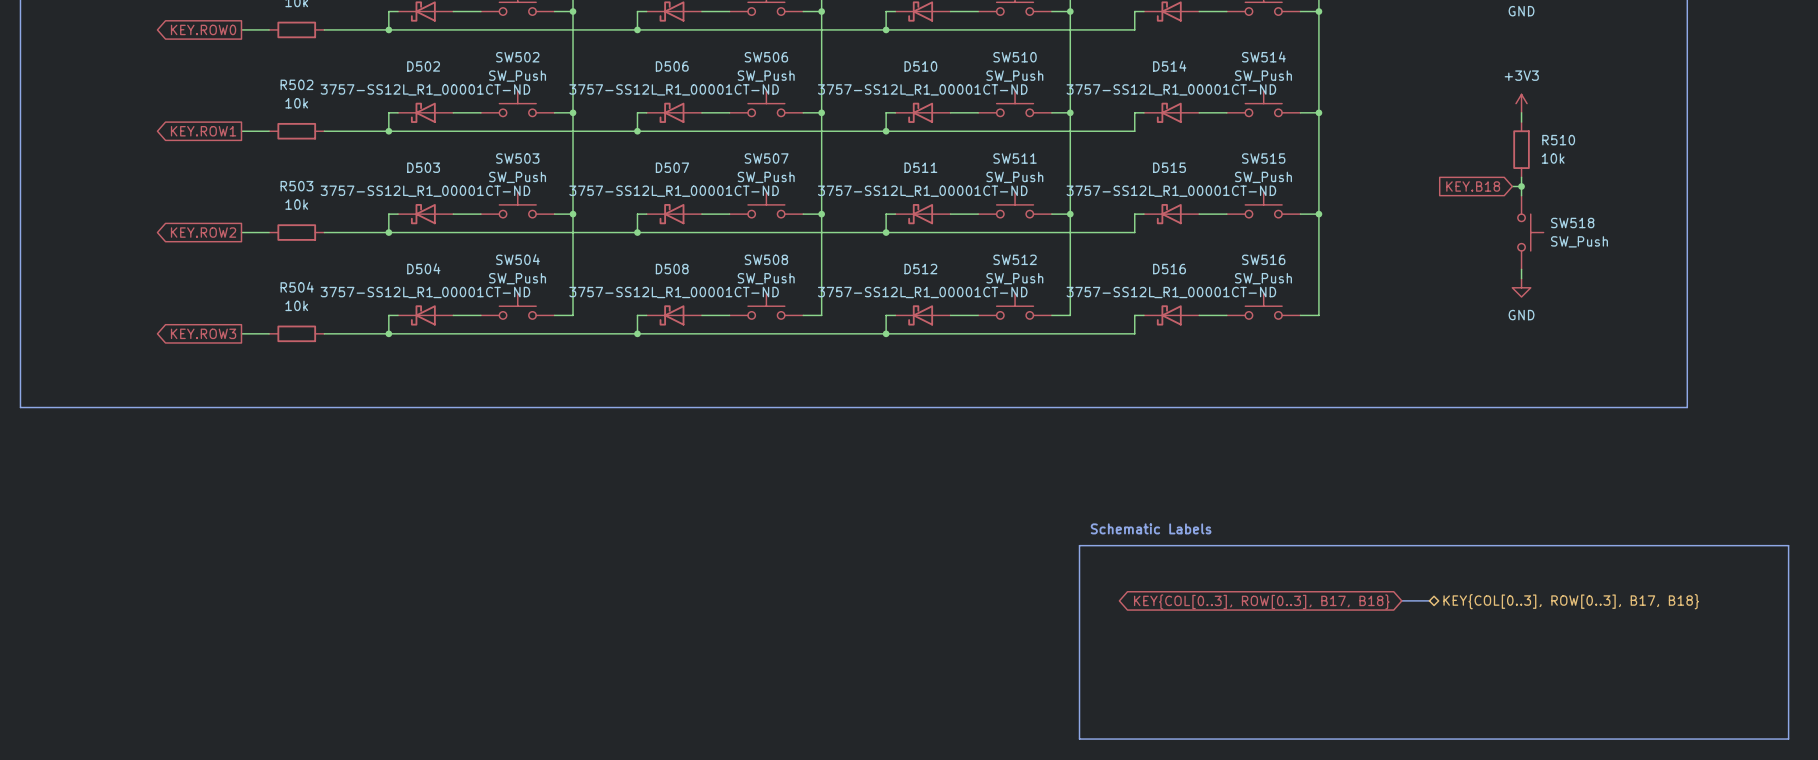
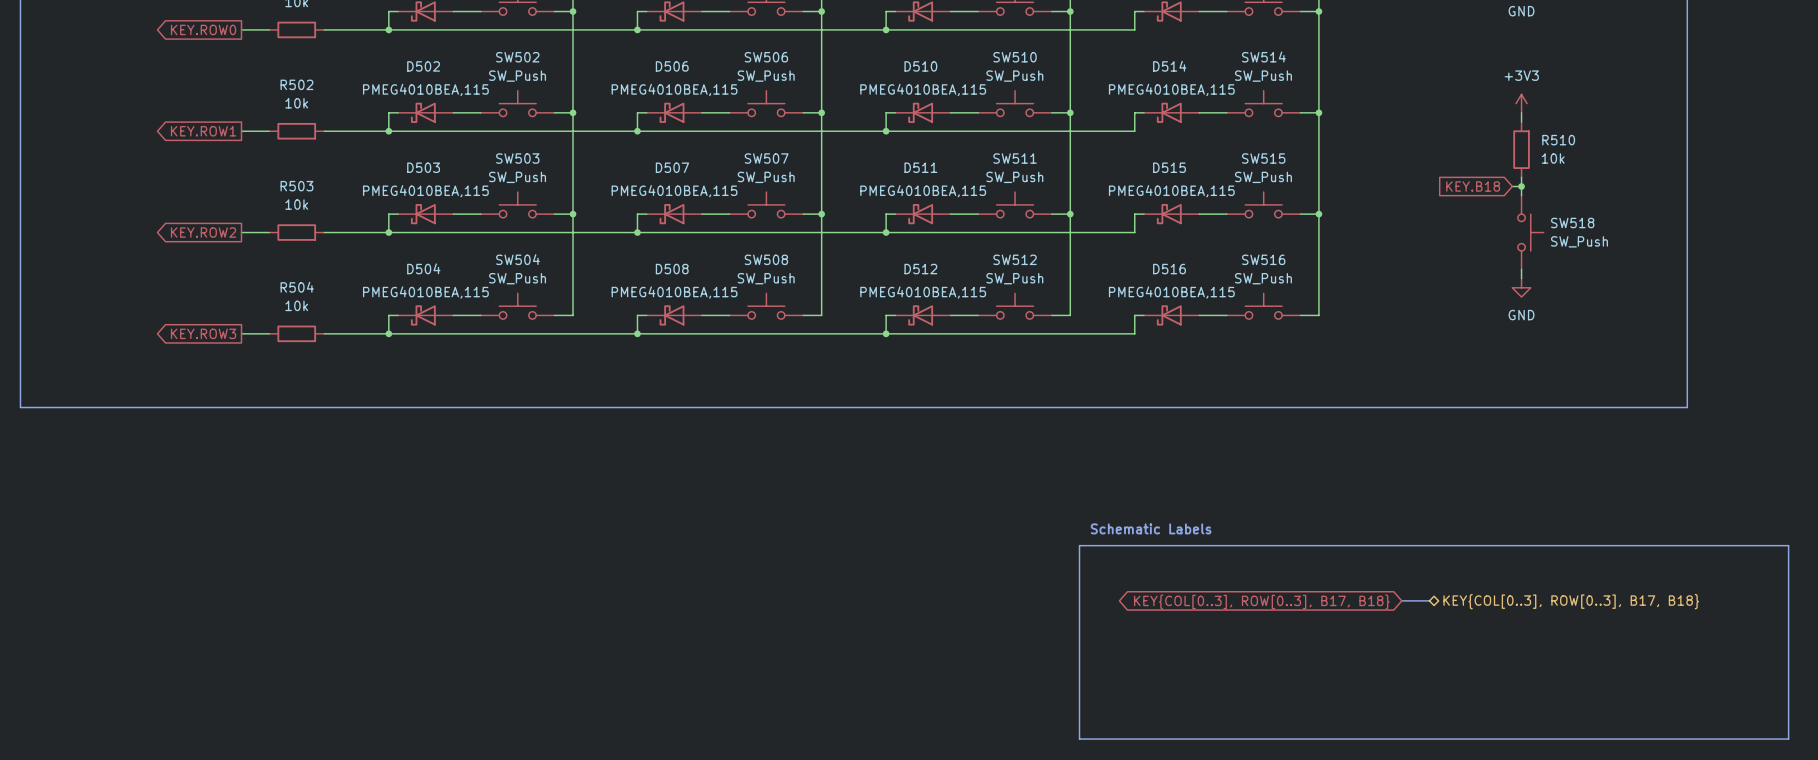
D502 value: 3757-SS12L_R1_00001CT-ND (425, 89) -> PMEG4010BEA,115 (425, 89)
D506 value: 3757-SS12L_R1_00001CT-ND (674, 89) -> PMEG4010BEA,115 (674, 89)
D510 value: 3757-SS12L_R1_00001CT-ND (922, 89) -> PMEG4010BEA,115 (923, 89)
D514 value: 3757-SS12L_R1_00001CT-ND (1171, 89) -> PMEG4010BEA,115 (1171, 89)
D503 value: 3757-SS12L_R1_00001CT-ND (425, 191) -> PMEG4010BEA,115 (425, 191)
D507 value: 3757-SS12L_R1_00001CT-ND (674, 191) -> PMEG4010BEA,115 (674, 191)
D511 value: 3757-SS12L_R1_00001CT-ND (922, 191) -> PMEG4010BEA,115 (923, 191)
D515 value: 3757-SS12L_R1_00001CT-ND (1171, 191) -> PMEG4010BEA,115 (1171, 191)
D504 value: 3757-SS12L_R1_00001CT-ND (425, 292) -> PMEG4010BEA,115 (425, 292)
D508 value: 3757-SS12L_R1_00001CT-ND (674, 292) -> PMEG4010BEA,115 (674, 292)
D512 value: 3757-SS12L_R1_00001CT-ND (922, 292) -> PMEG4010BEA,115 (923, 292)
D516 value: 3757-SS12L_R1_00001CT-ND (1171, 292) -> PMEG4010BEA,115 (1171, 292)

